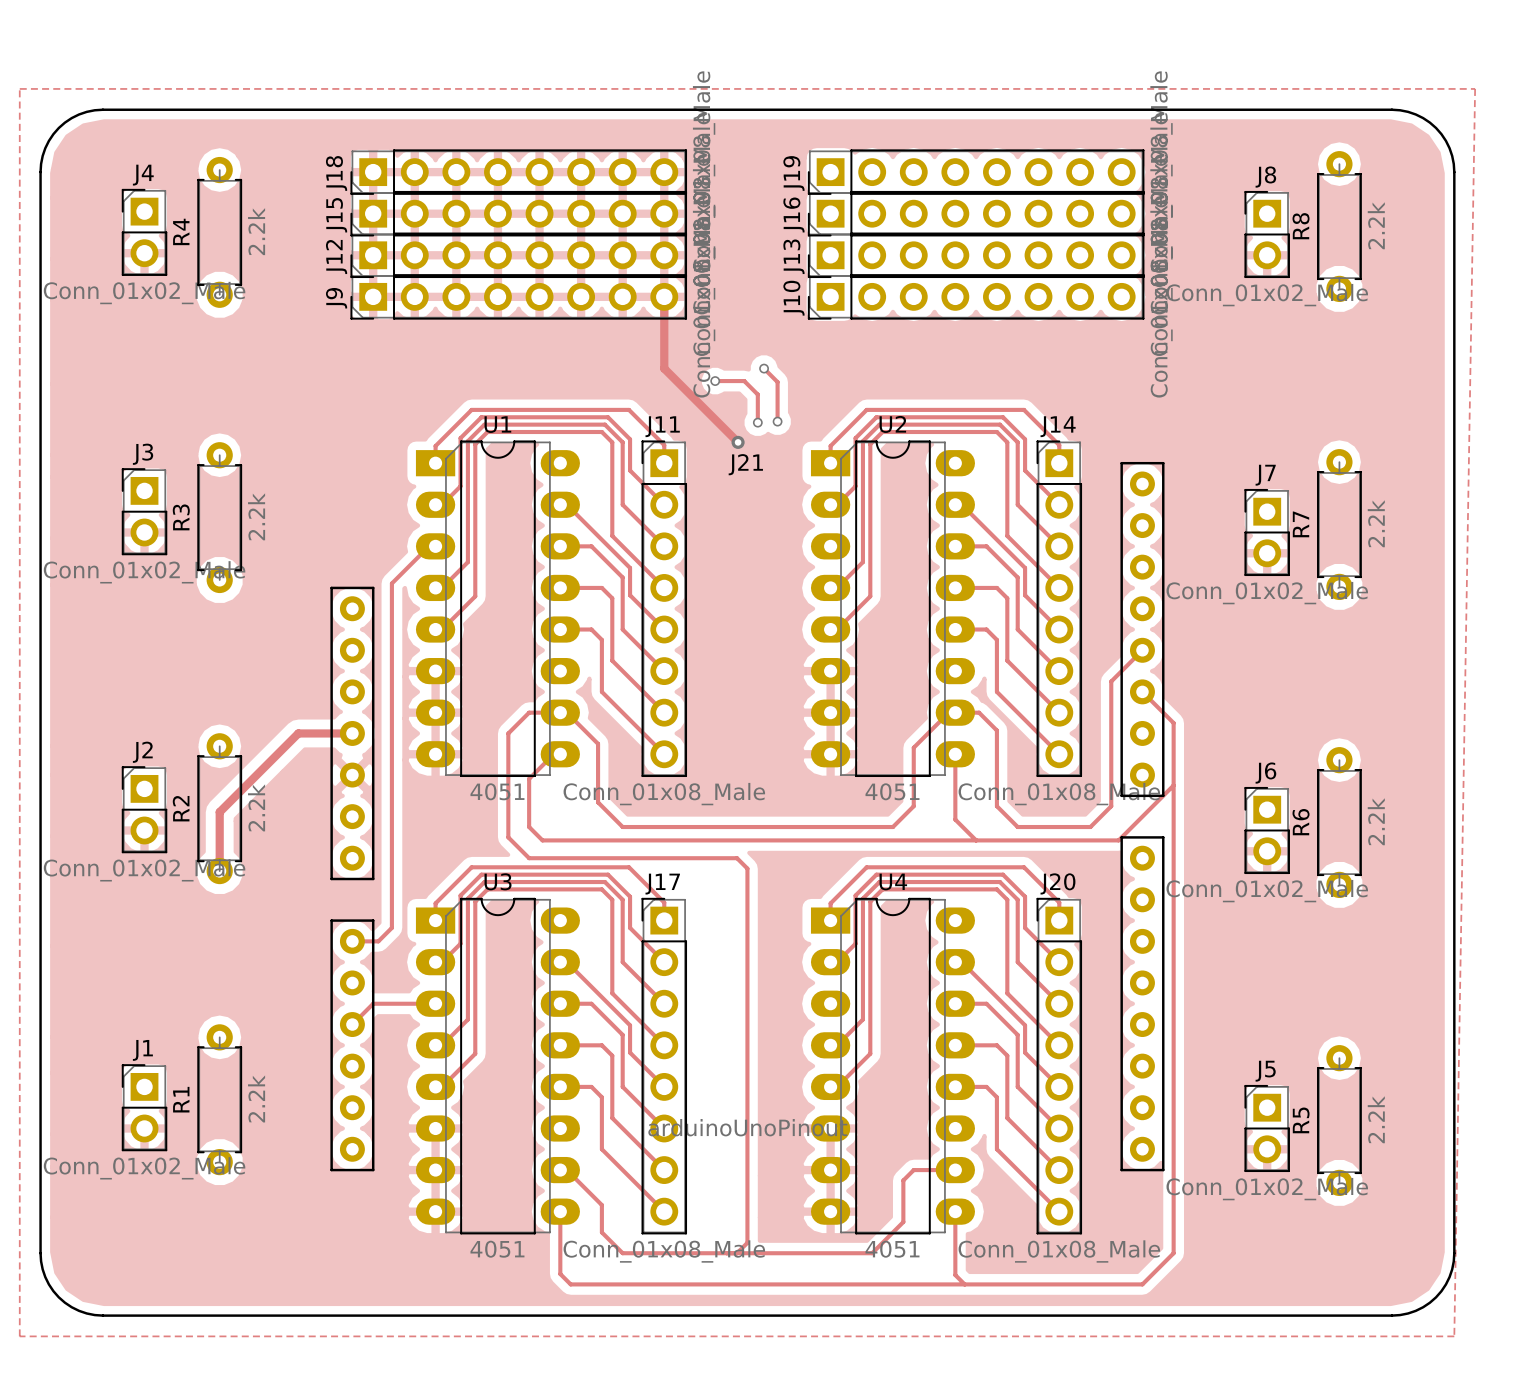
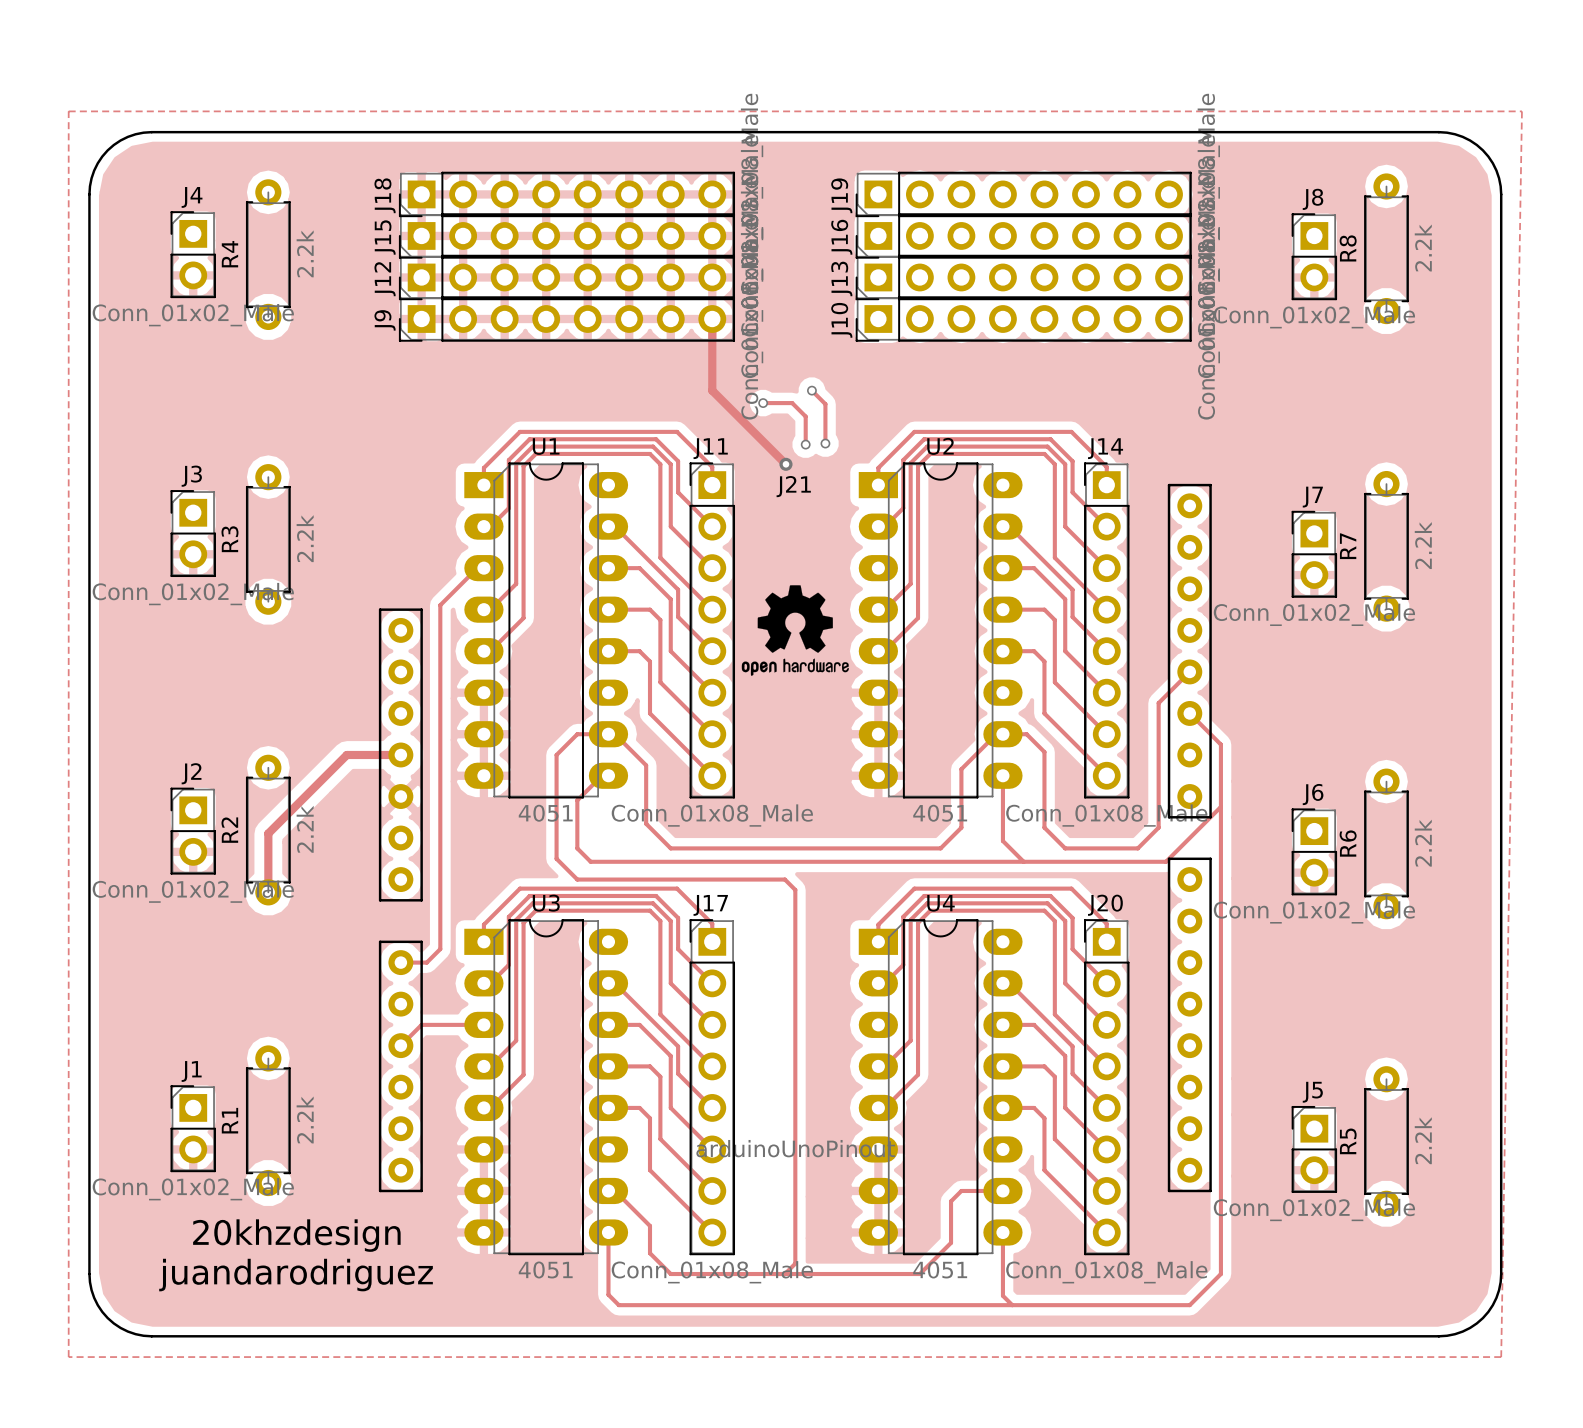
drawing: none -> [741, 585, 849, 676]
text: none -> 20khzdesign (296, 1235)
text: none -> juandarodriguez (296, 1275)

